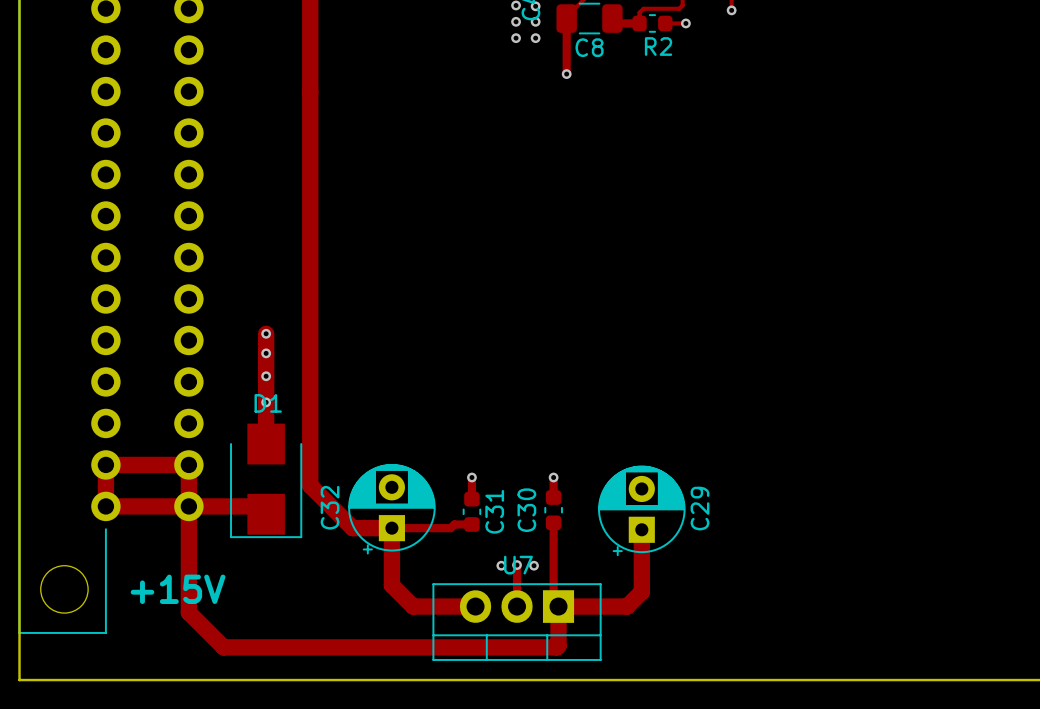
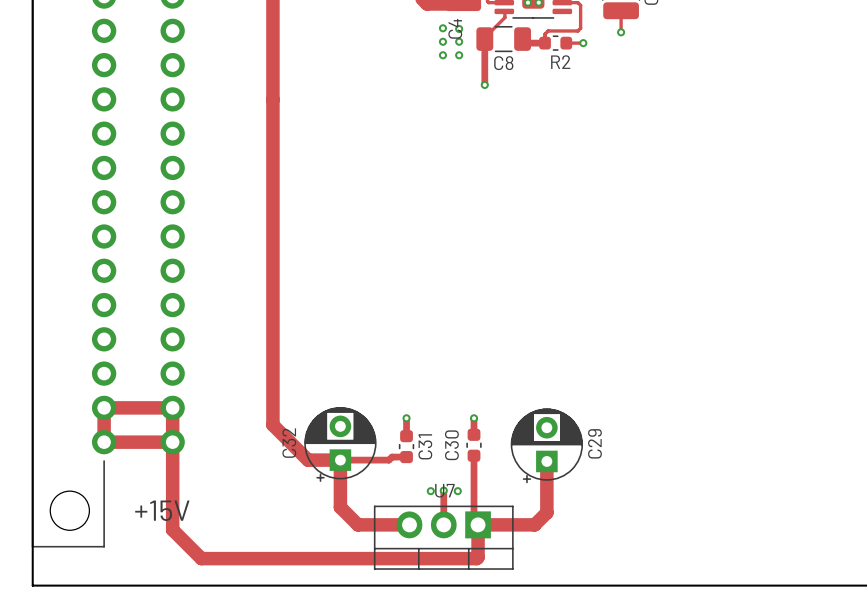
top track: (266, 333) (266, 444) -> none
via: (266, 333) -> none
via: (266, 353) -> none
via: (266, 376) -> none
via: (266, 402) -> none
D1: (266, 480) -> none
top track: (188, 506) (258, 506) (266, 514) -> none

